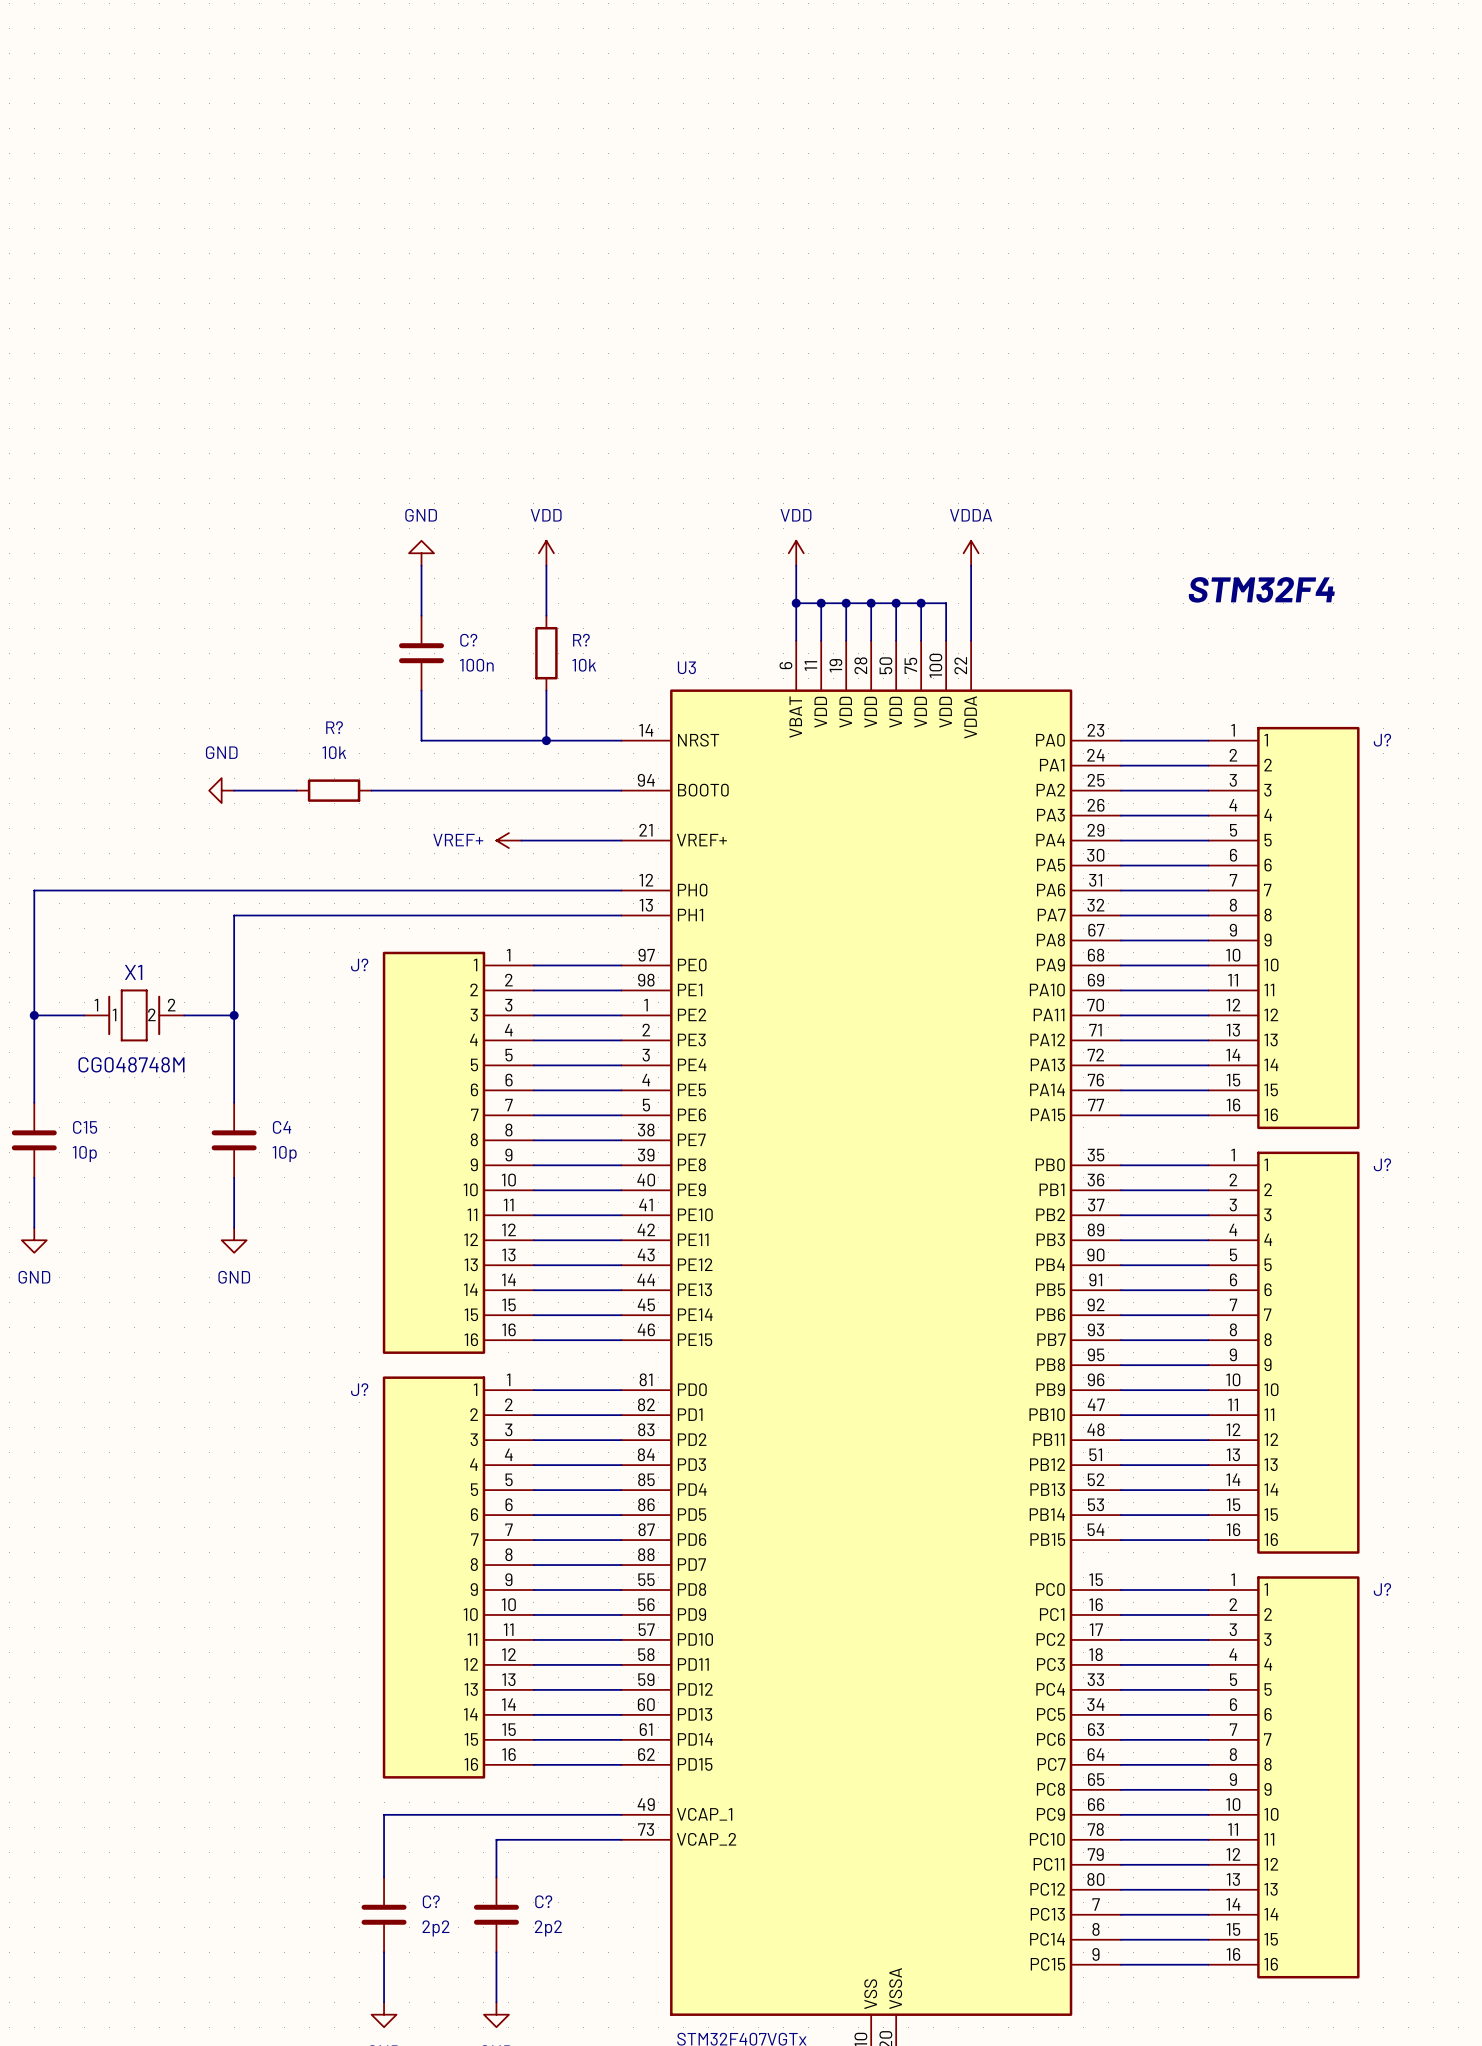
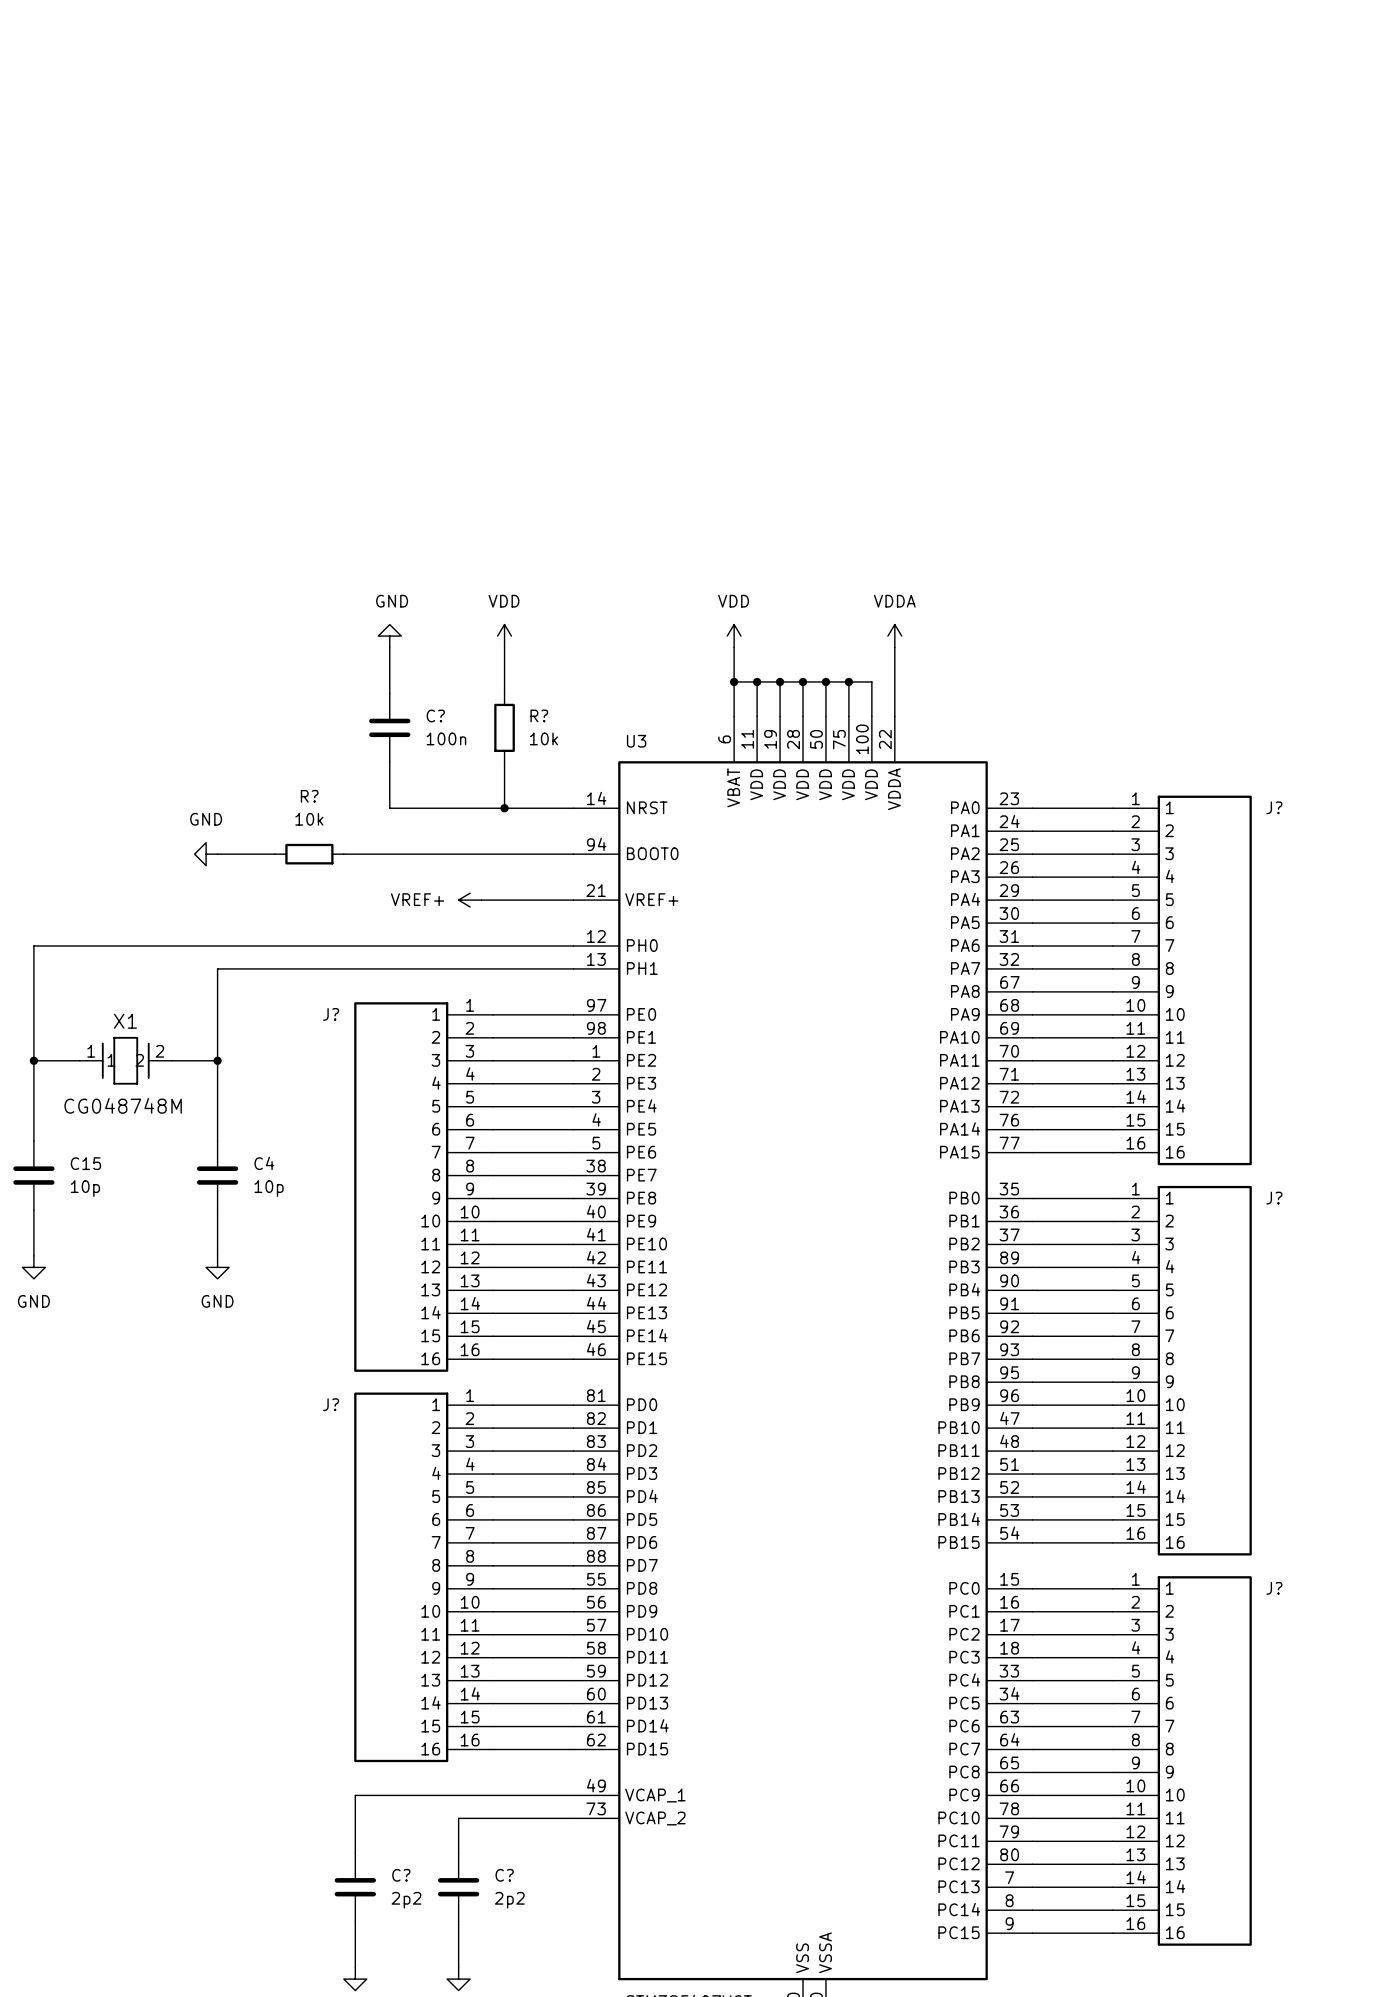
text: STM32F4 (1261, 589) -> none

